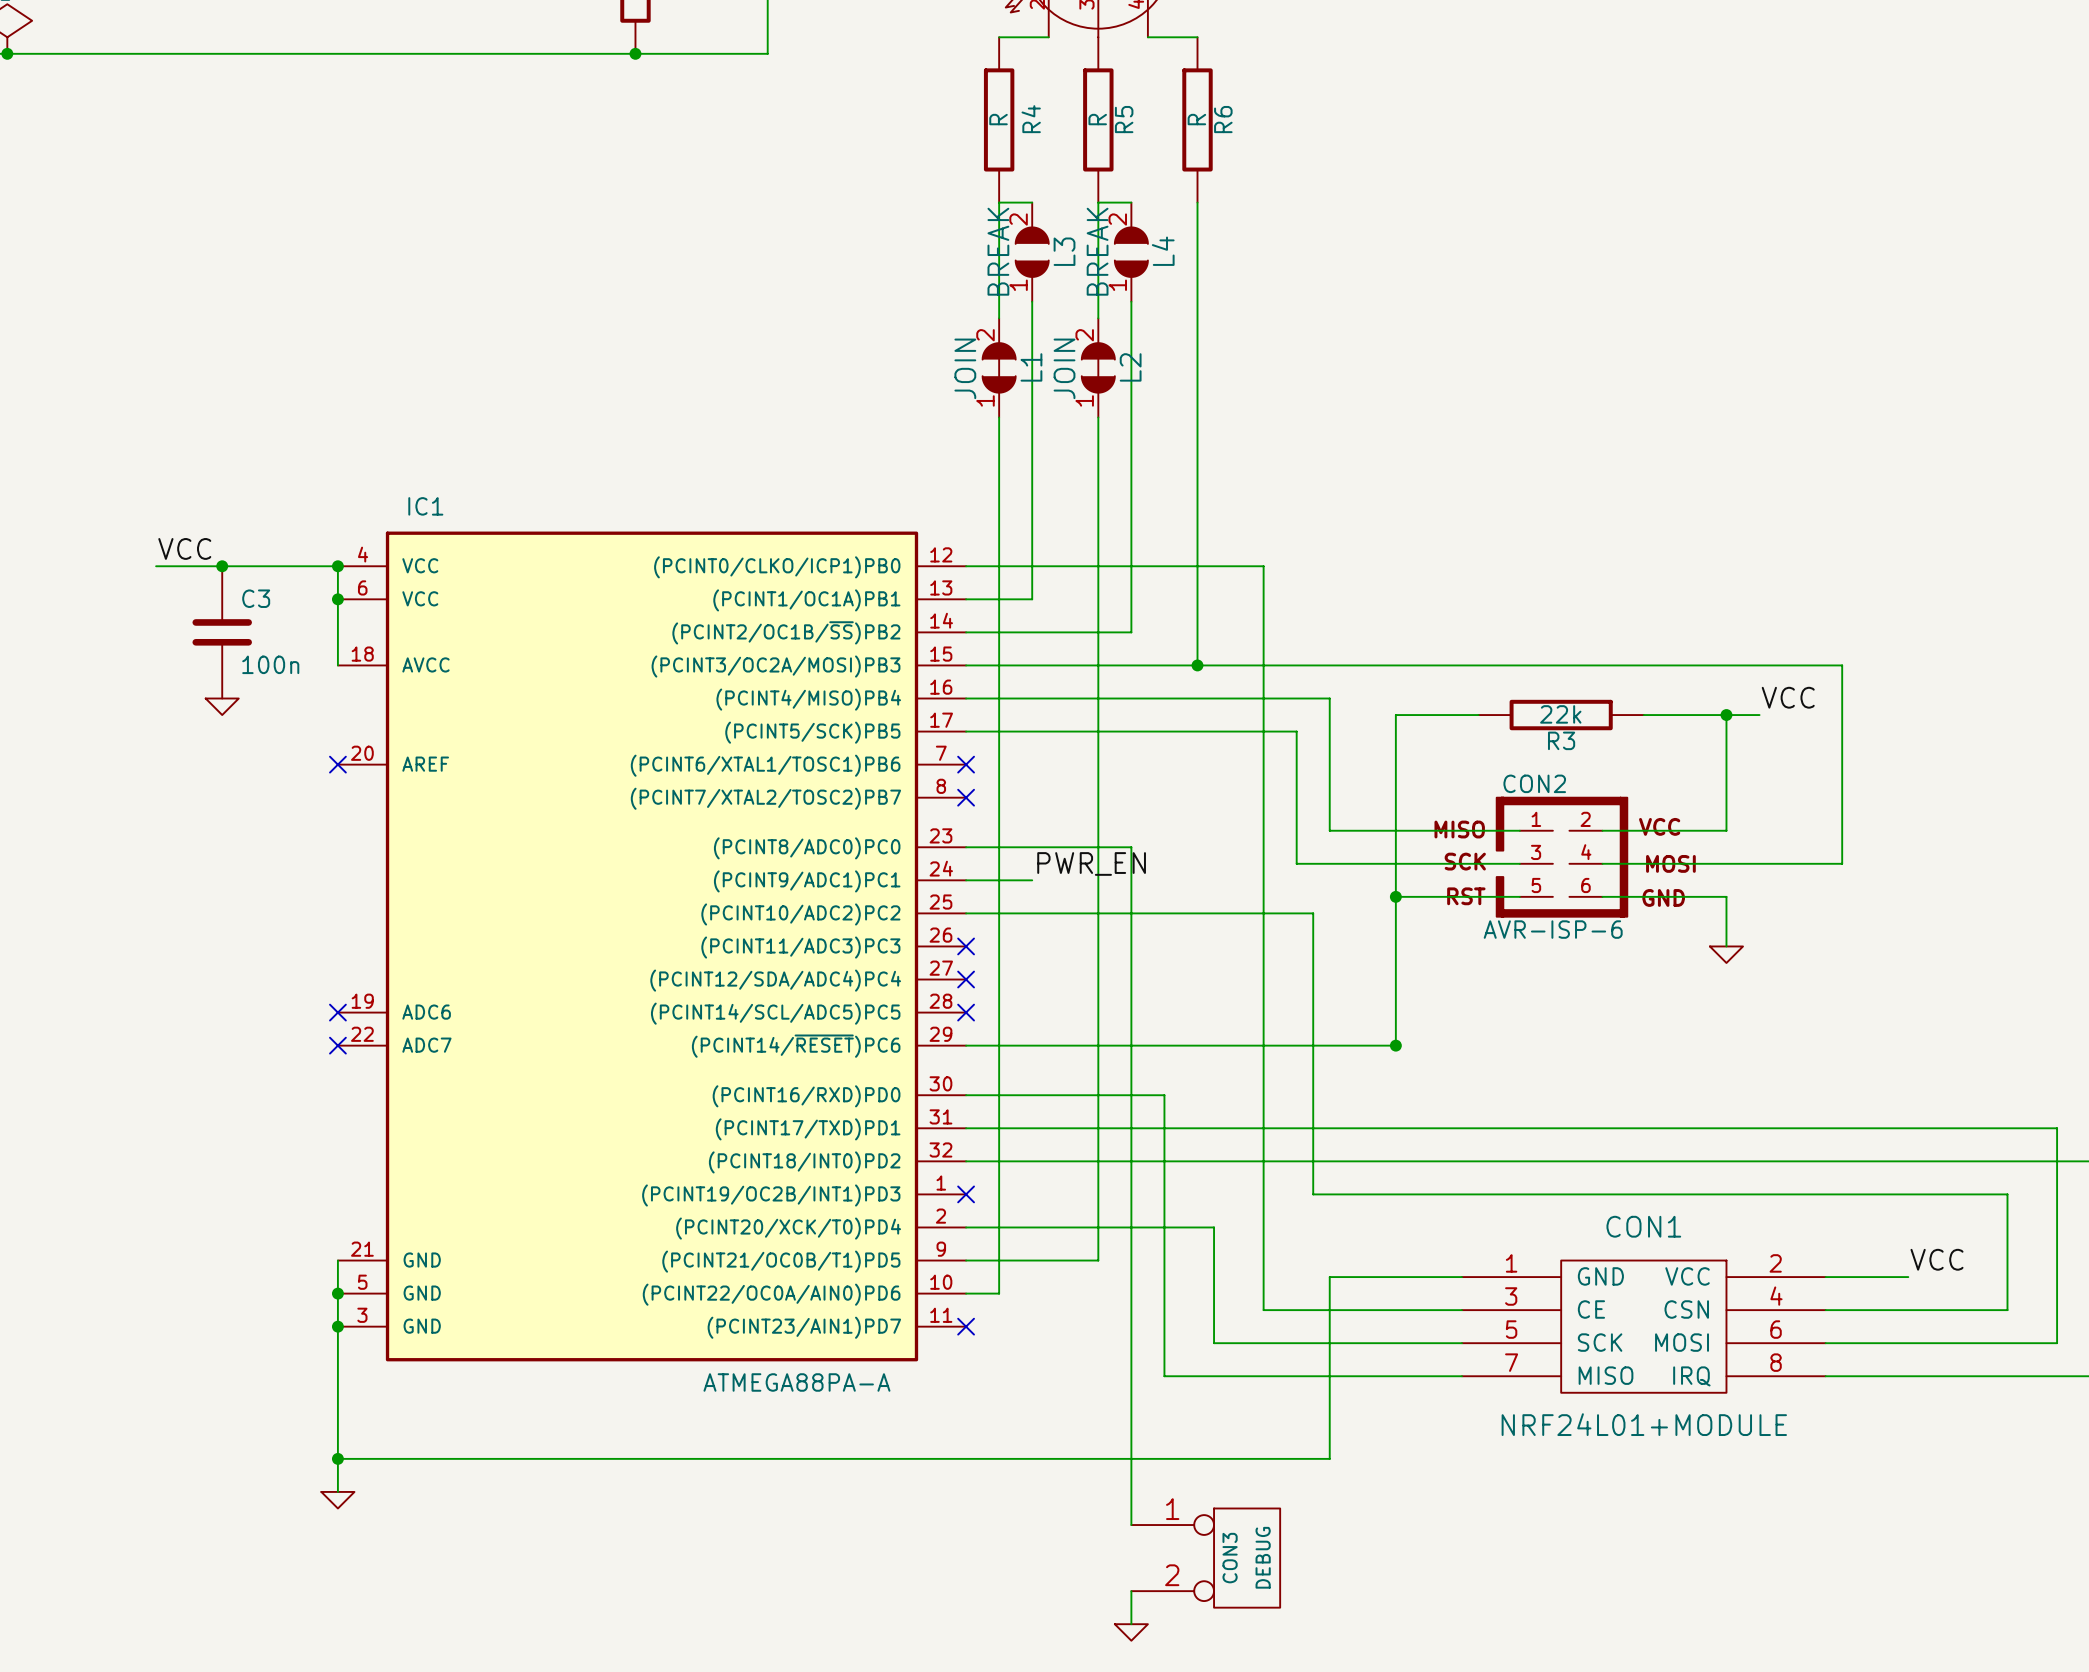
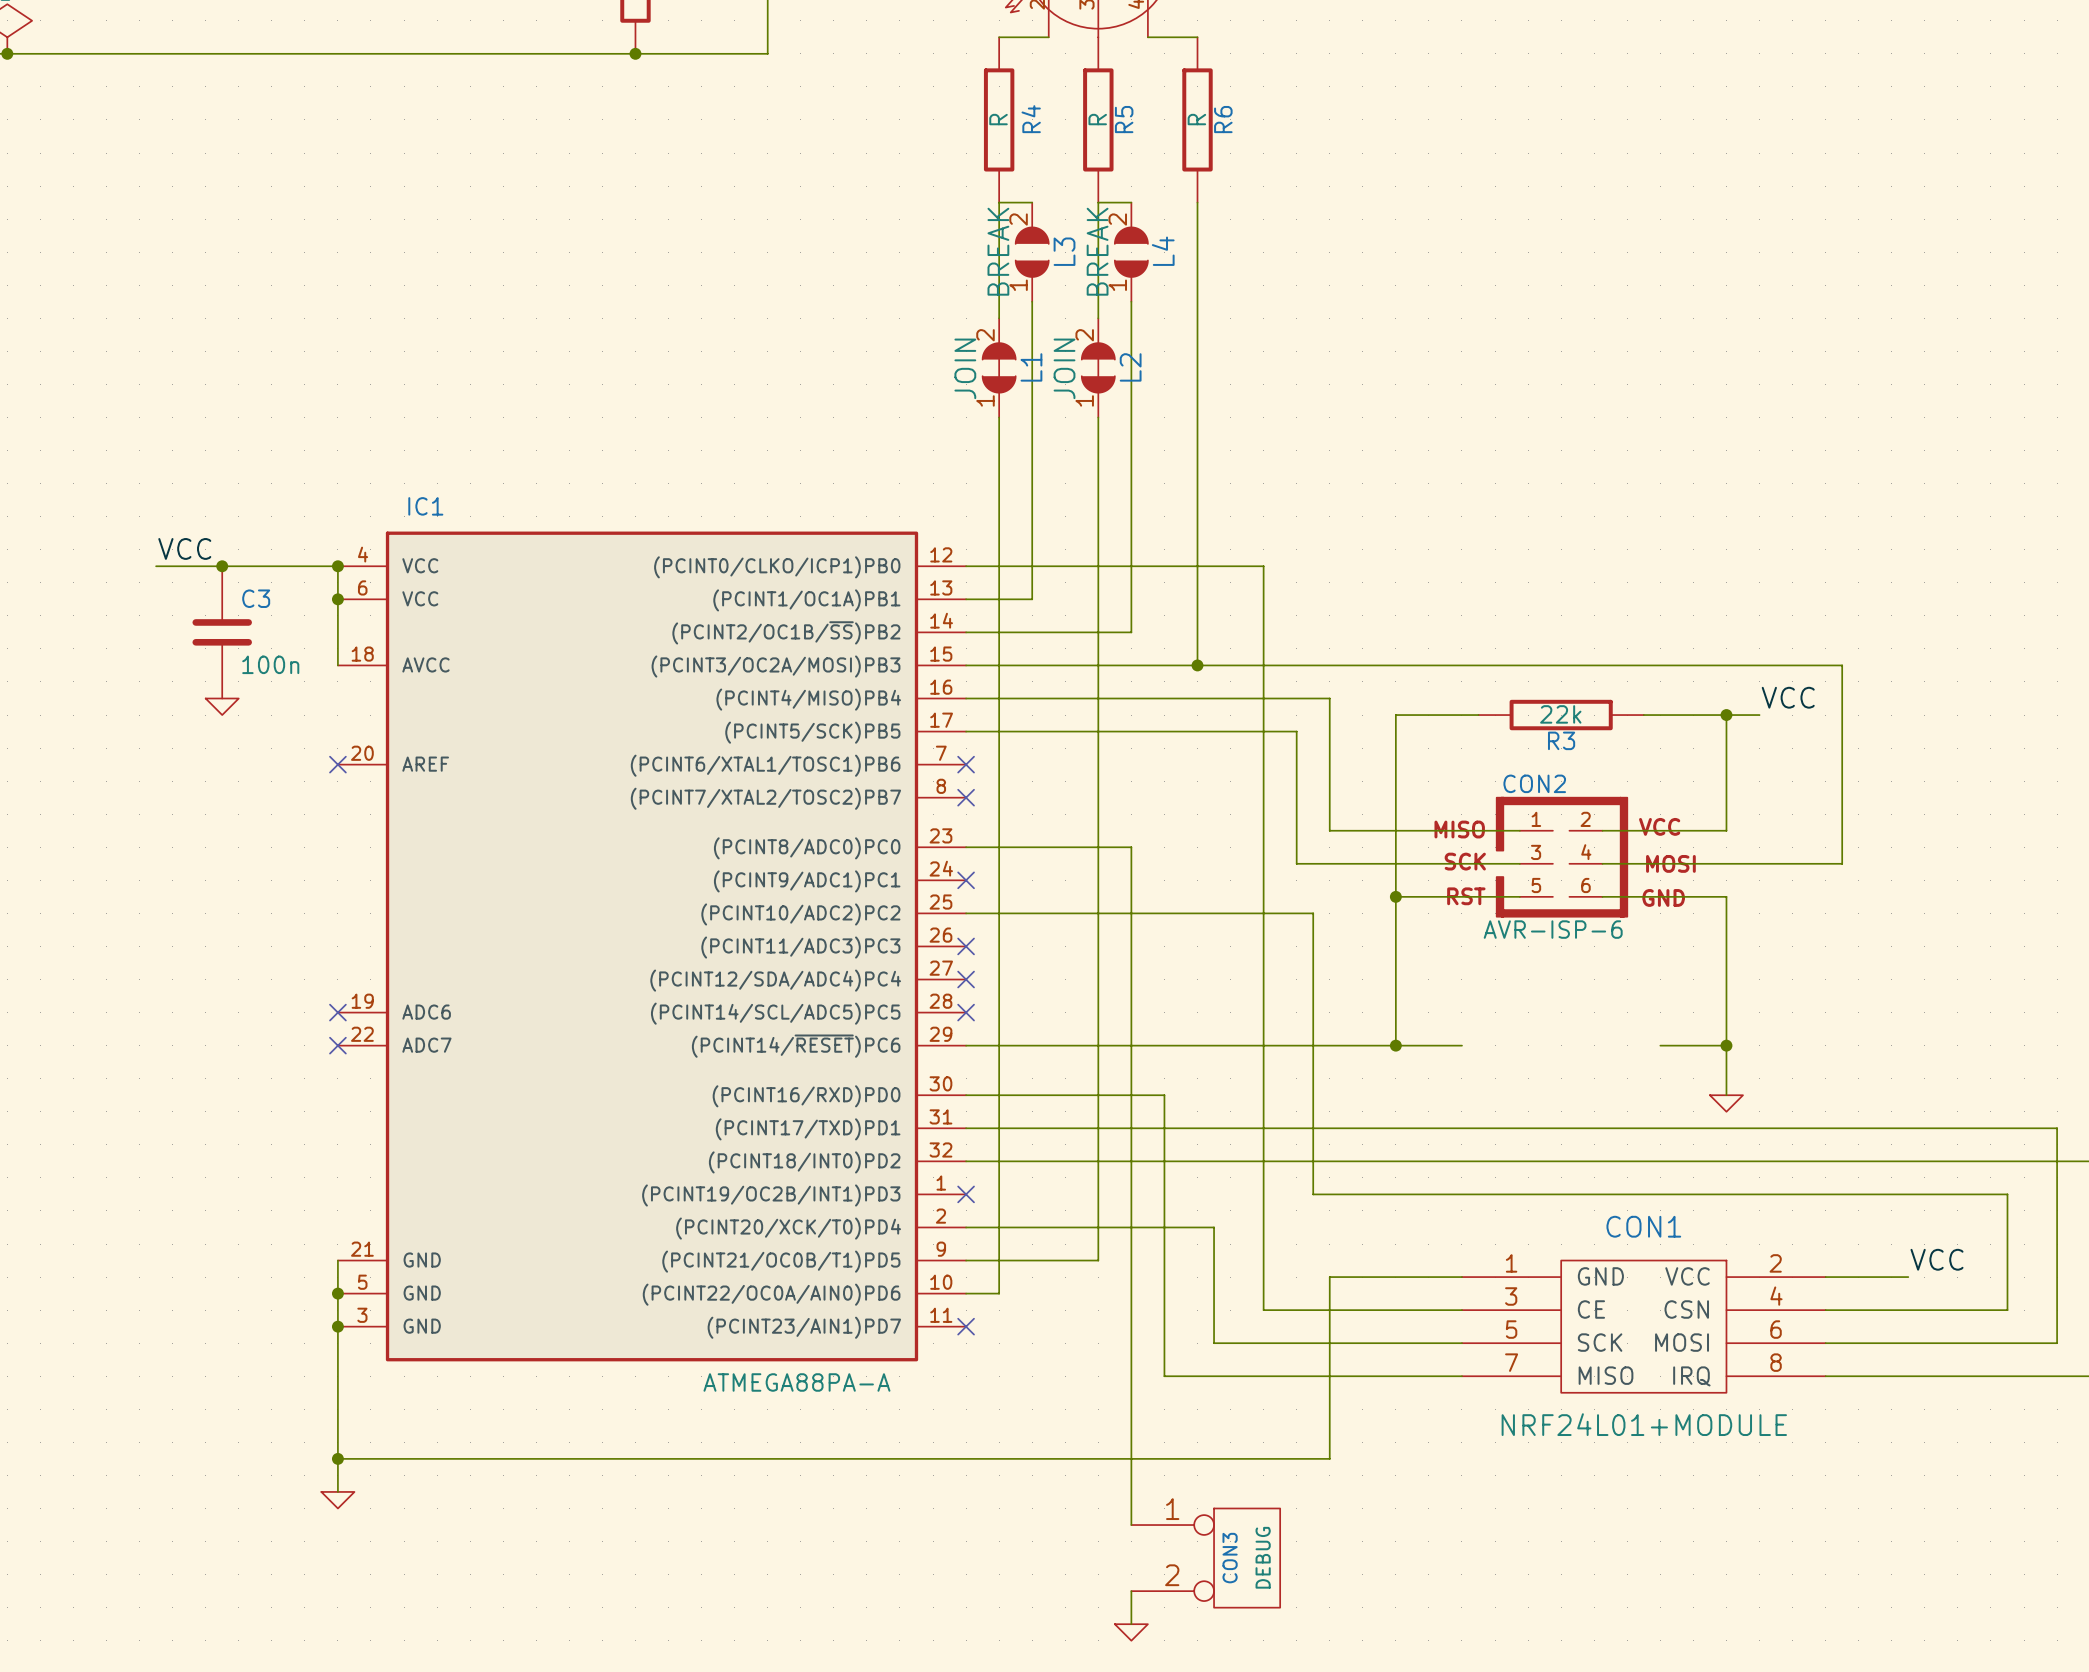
label: PWR_EN (1091, 863) -> none
wire: (966, 880) (1032, 880) -> none
no-connect mark: none -> (966, 880)
wire: none -> (1726, 946) (1726, 1095)
power symbol position: (1726, 954) -> (1726, 1103)
wire: none -> (1395, 1045) (1461, 1045)
wire: none -> (1660, 1045) (1726, 1045)
junction: none -> (1726, 1045)

